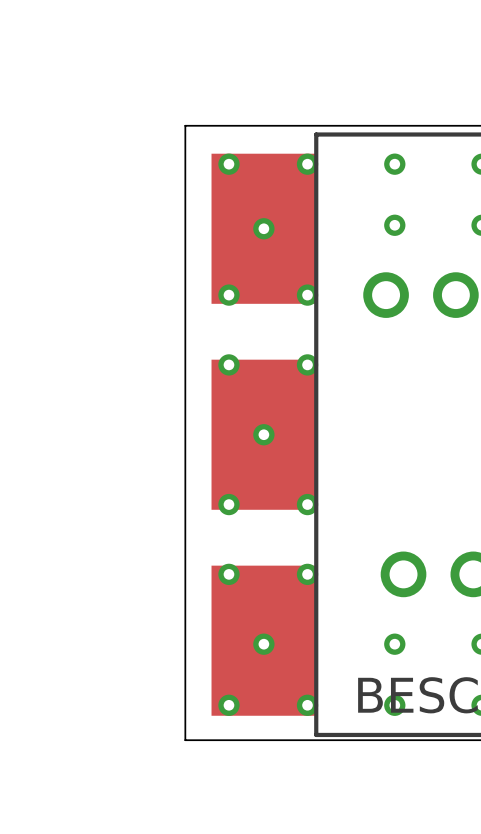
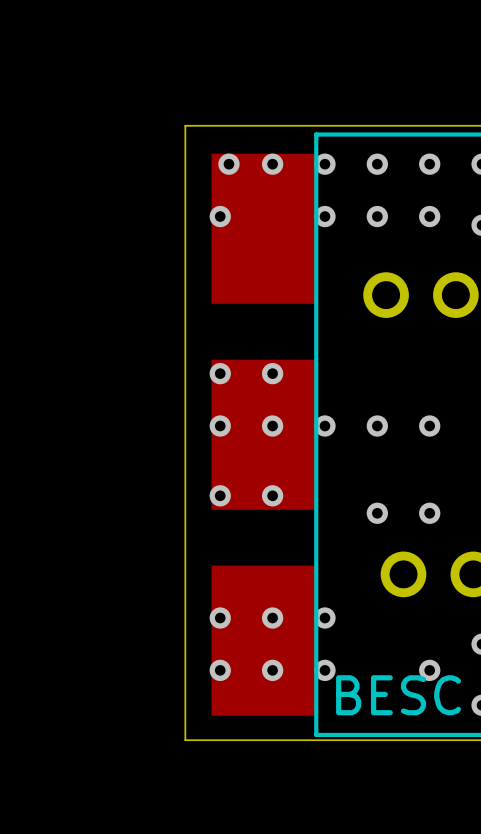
via: none -> (272, 164)
via position: (307, 164) -> (324, 164)
via position: (394, 164) -> (377, 164)
via: none -> (429, 164)
via: none -> (220, 216)
via: none -> (324, 216)
via: none -> (429, 216)
via position: (394, 225) -> (377, 216)
via: (263, 228) -> none
via: (228, 295) -> none
via: (307, 295) -> none
via position: (228, 364) -> (220, 373)
via: (307, 364) -> none
via: none -> (272, 373)
via: none -> (220, 426)
via: none -> (324, 426)
via: none -> (377, 426)
via: none -> (429, 426)
via position: (263, 434) -> (272, 426)
via: none -> (272, 495)
via position: (228, 504) -> (220, 495)
via: (307, 504) -> none
via: none -> (377, 513)
via: none -> (429, 513)
via: (228, 574) -> none
via: (307, 574) -> none
via: none -> (220, 618)
via: none -> (272, 618)
via: none -> (324, 618)
via: (263, 644) -> none
via: (394, 644) -> none
via: none -> (220, 670)
via: none -> (272, 670)
via: none -> (324, 670)
via: none -> (429, 670)
via: (228, 705) -> none
via: (307, 705) -> none
via: (394, 705) -> none

